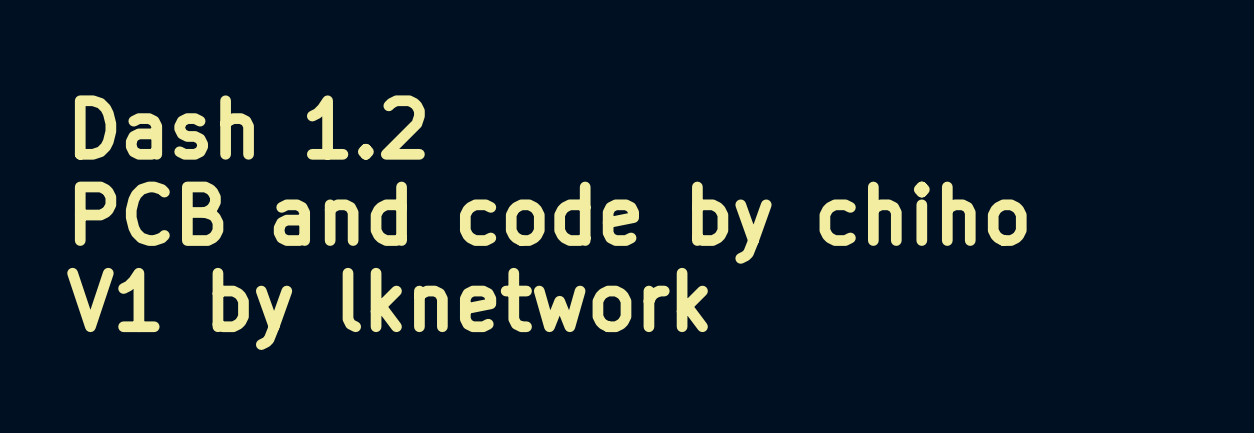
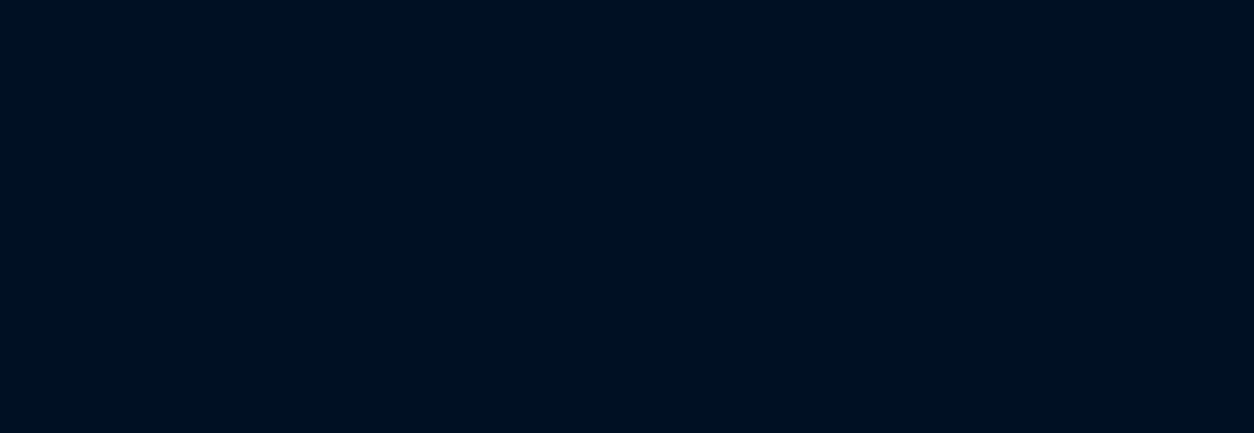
text: Dash 1.2 (249, 127) -> none
text: PCB and code by chiho (550, 222) -> none
text: V1 by lknetwork (387, 308) -> none

